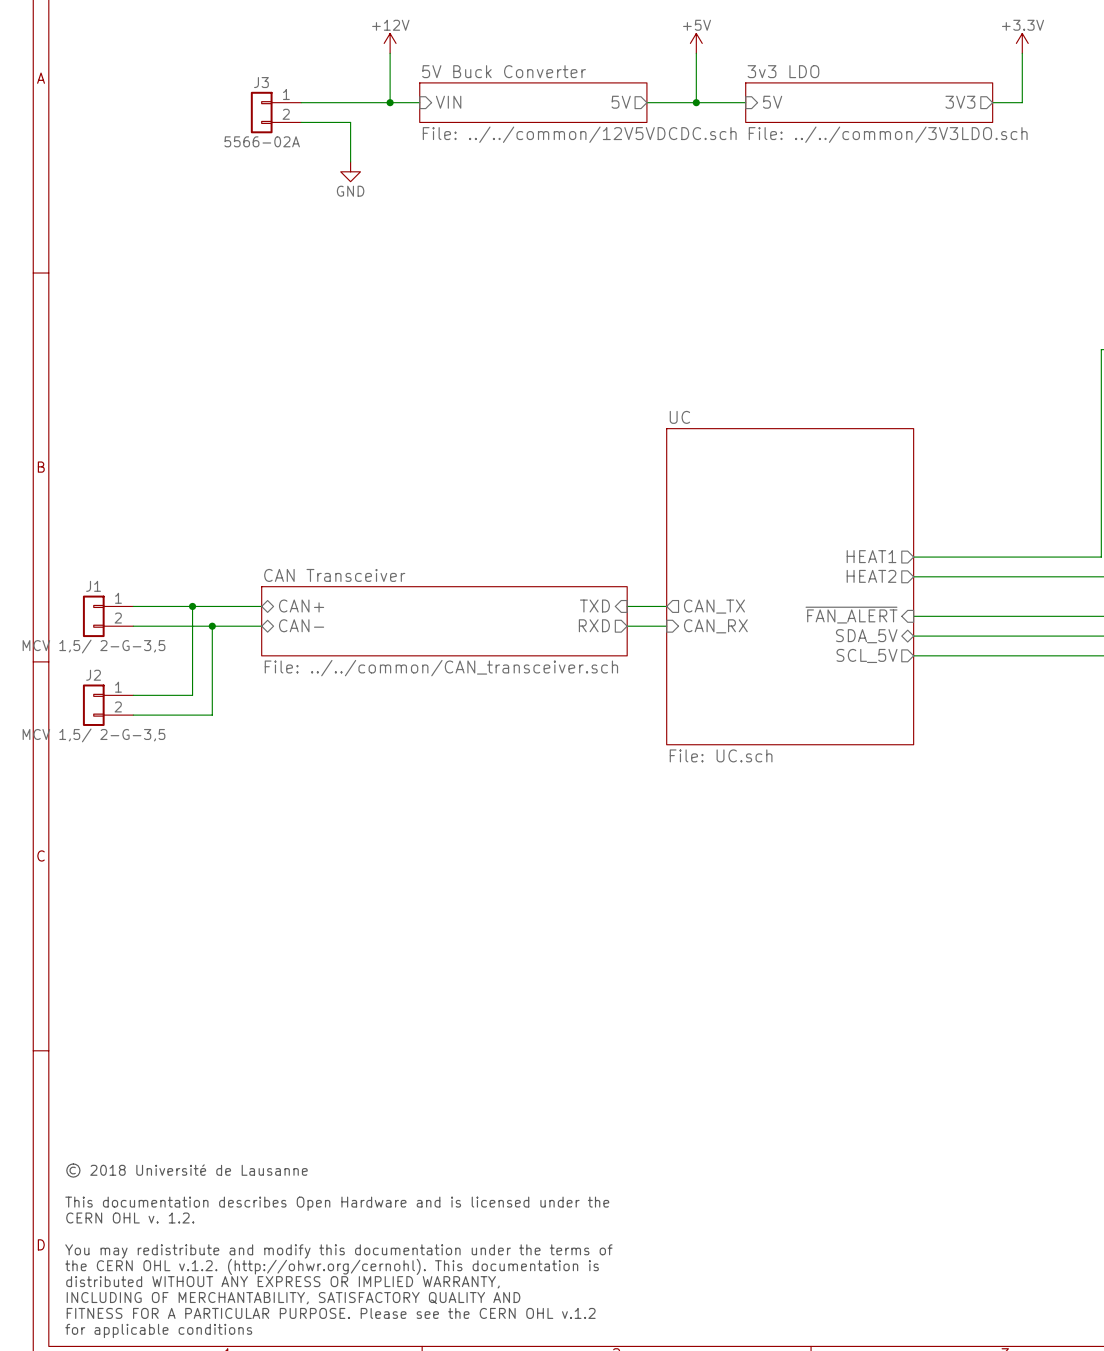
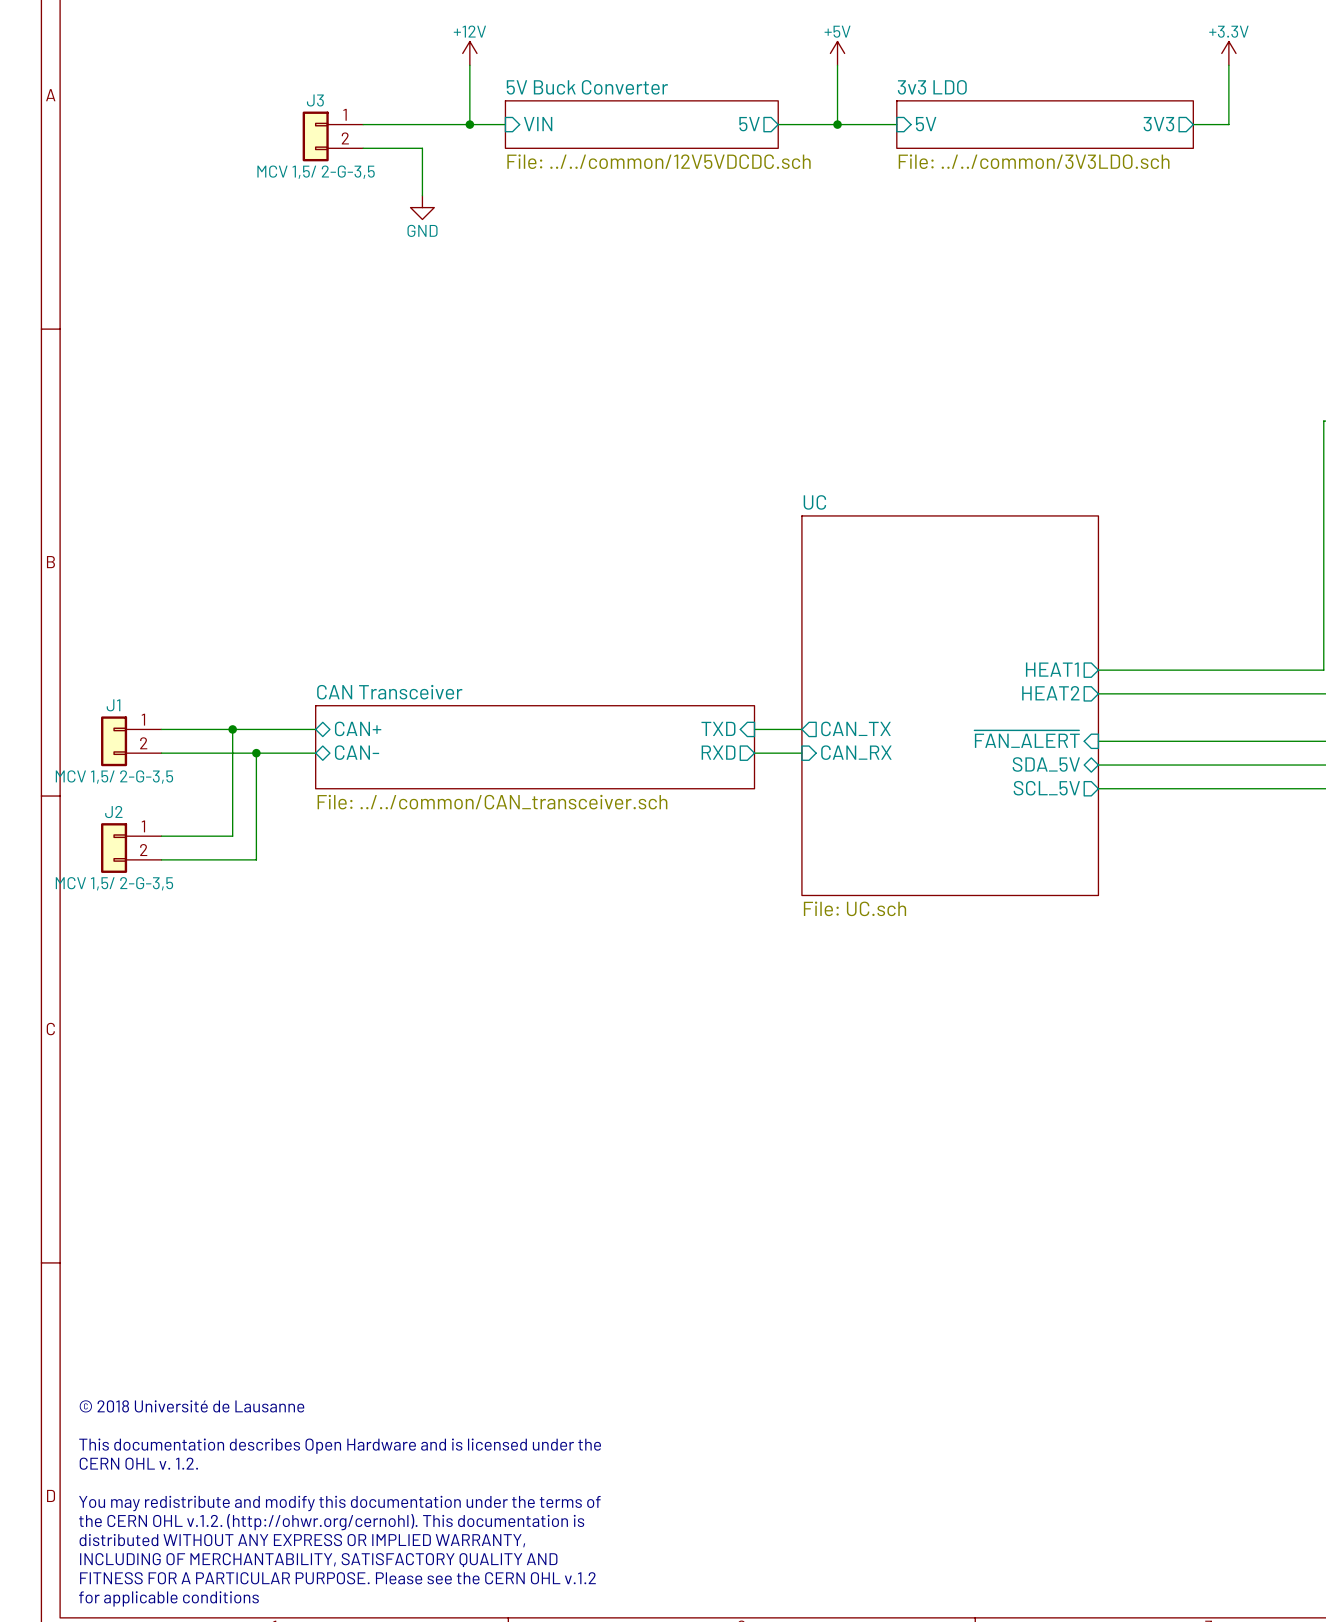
J3 value: 5566-02A (262, 141) -> MCV 1,5/ 2-G-3,5 (316, 172)

